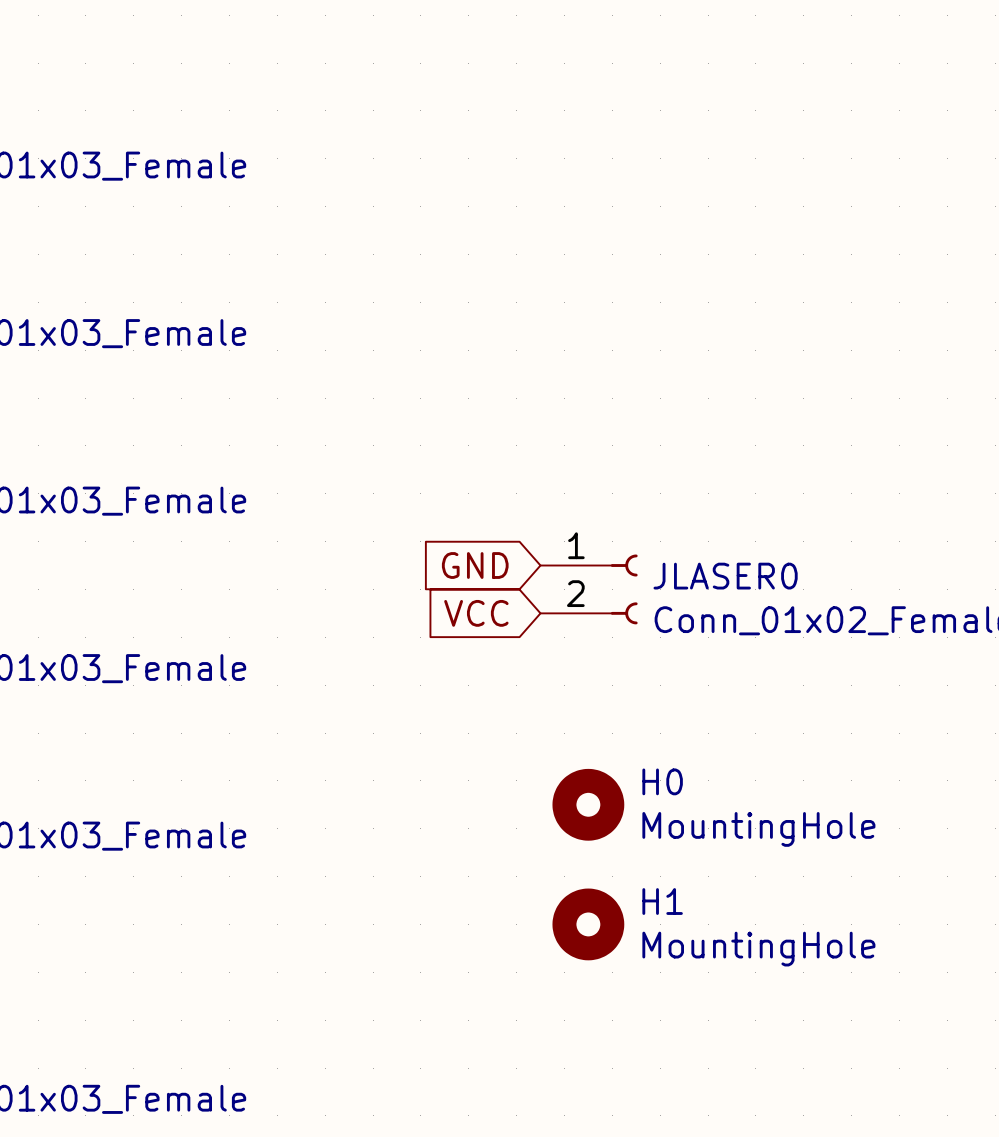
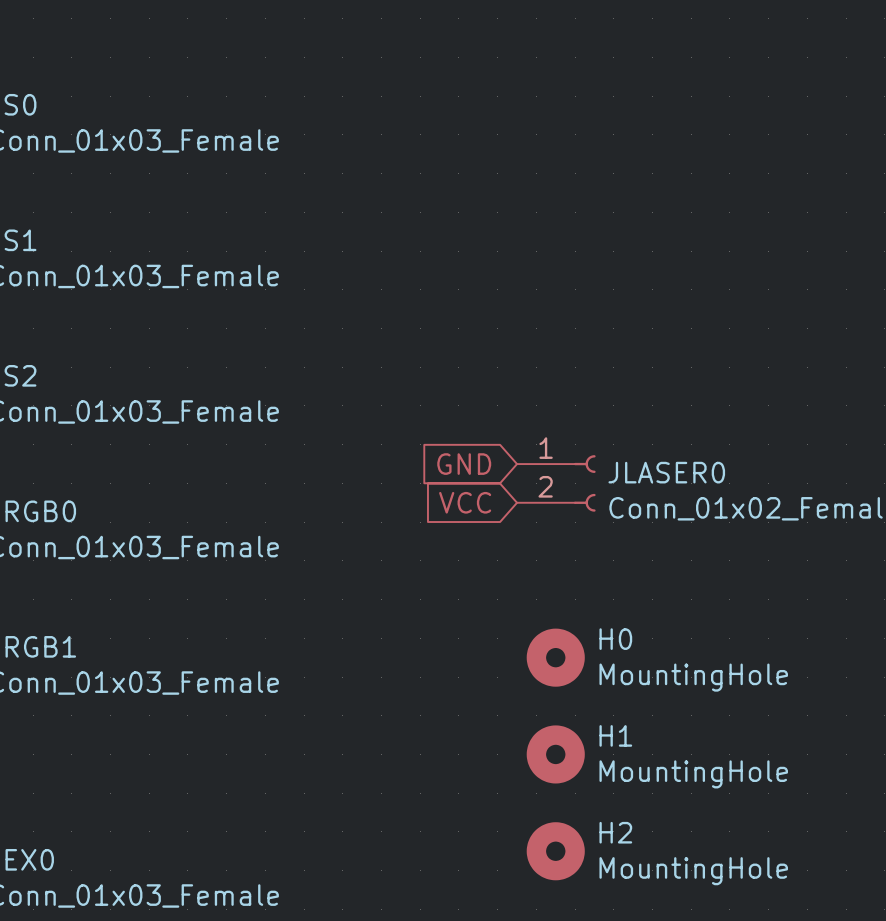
H2: none -> MountingHole (555, 851)

